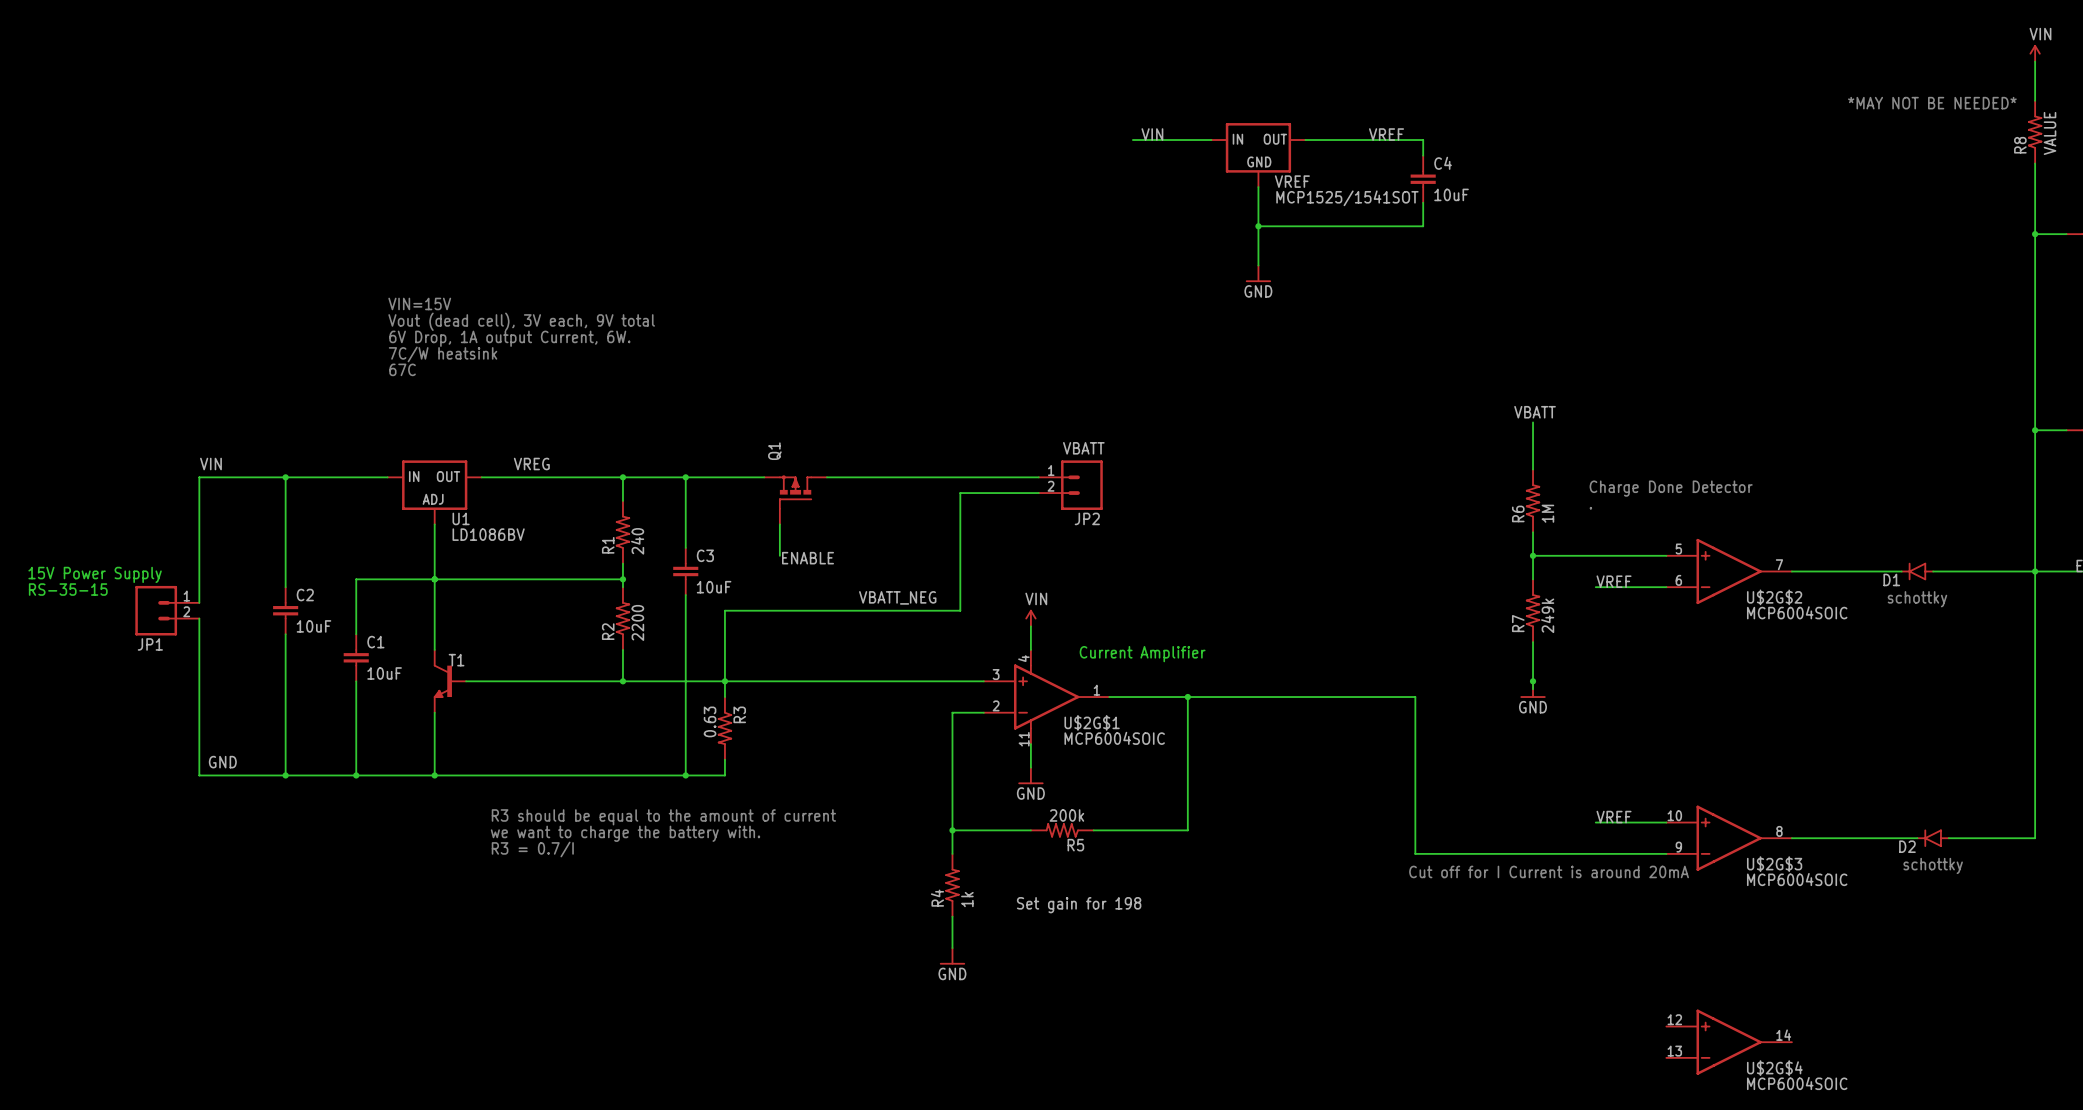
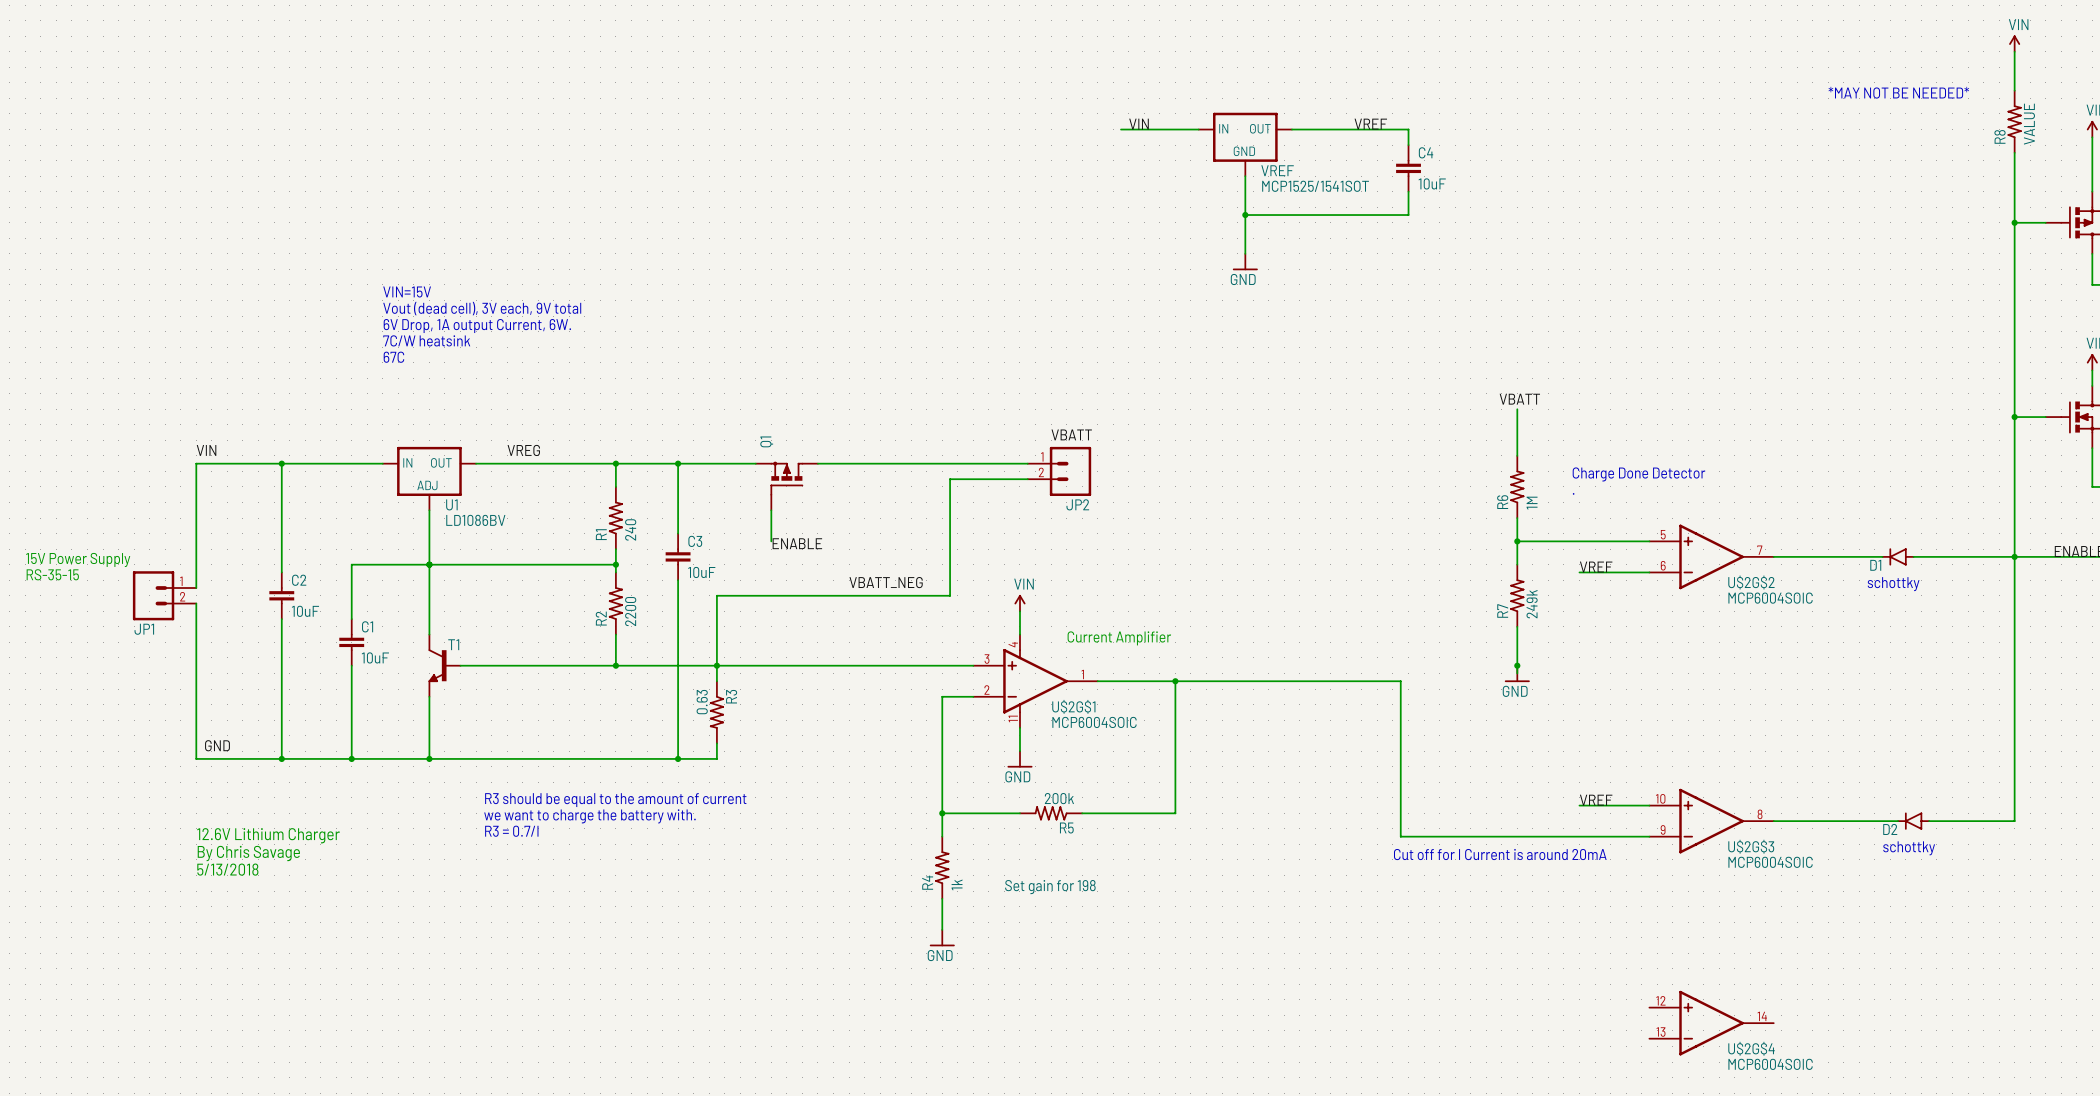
text: none -> 12.6V Lithium Charger (268, 835)
text: none -> By Chris Savage (248, 853)
text: none -> 5/13/2018 (227, 869)

